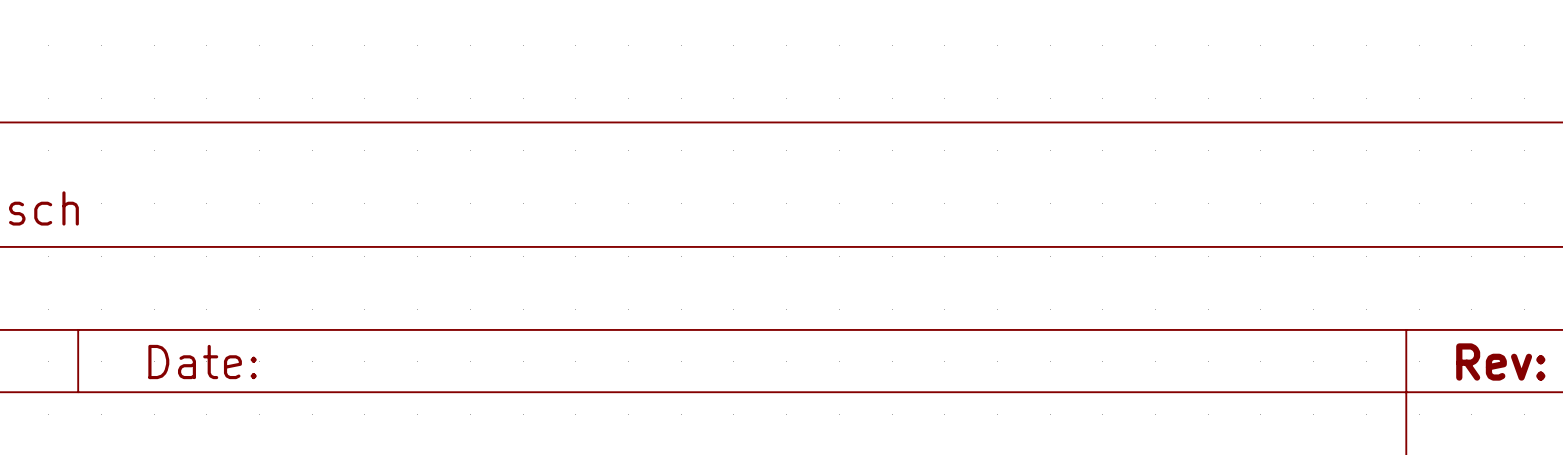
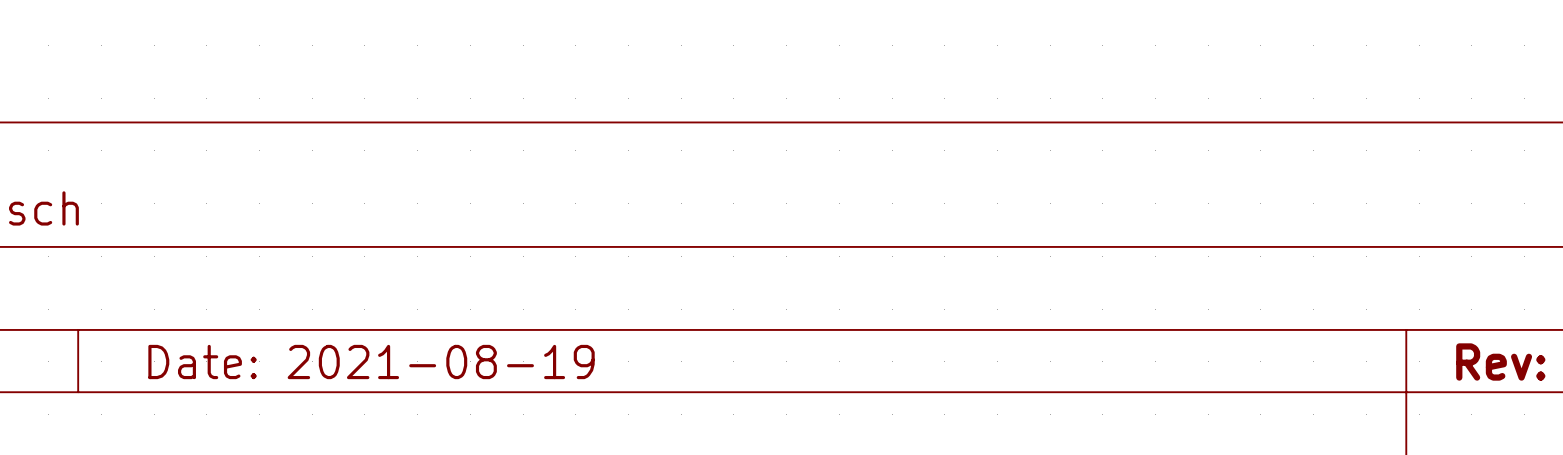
title block: Date: (202, 362) -> Date: 2021-08-19 (371, 362)

